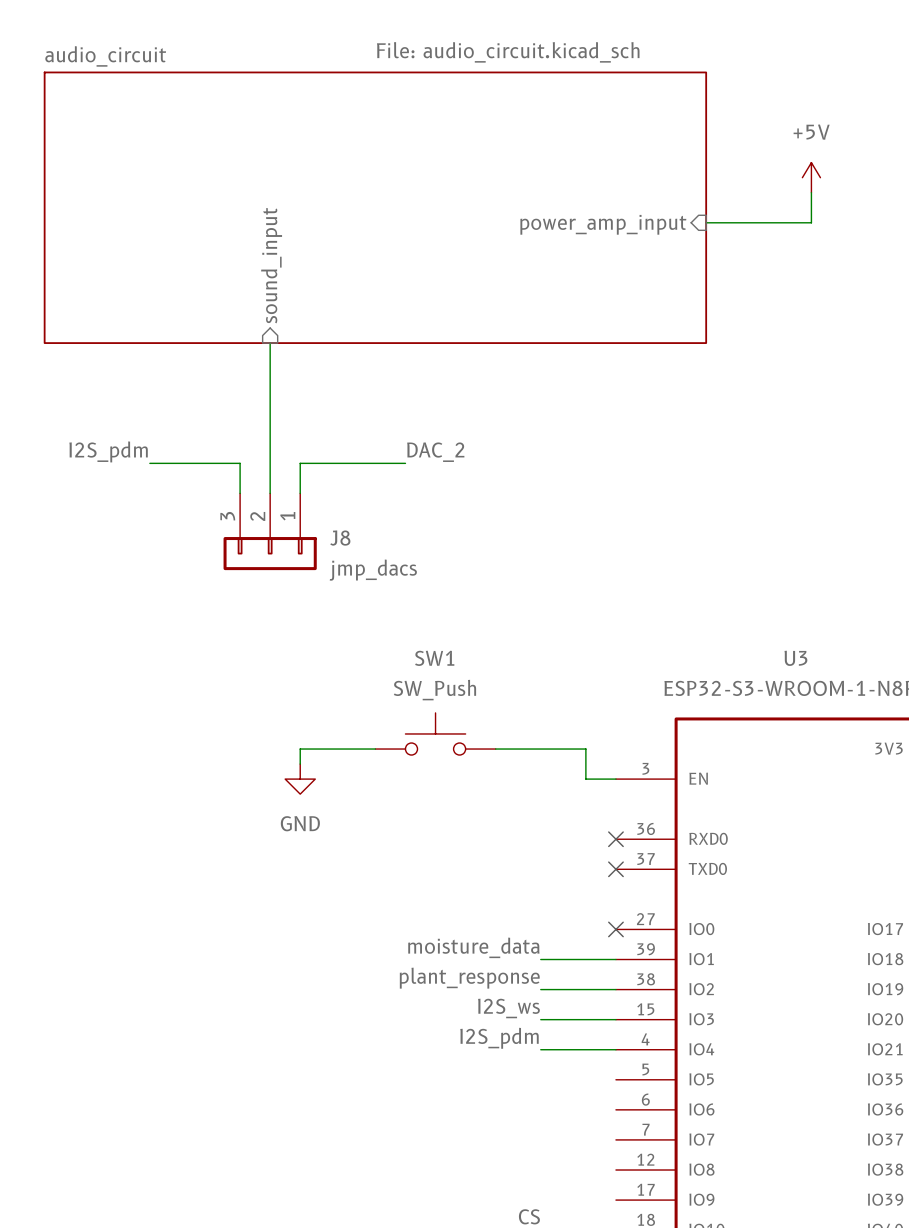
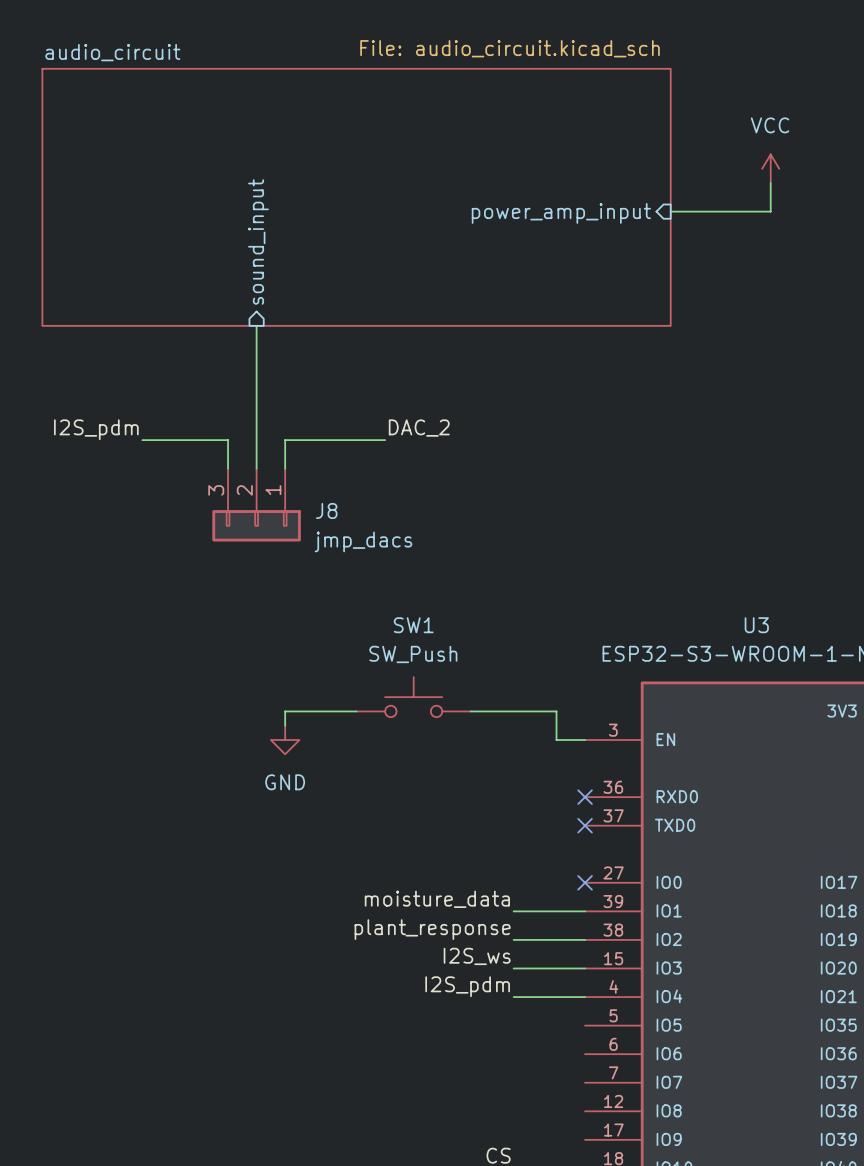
power symbol: +5V (811, 177) -> VCC (770, 168)

